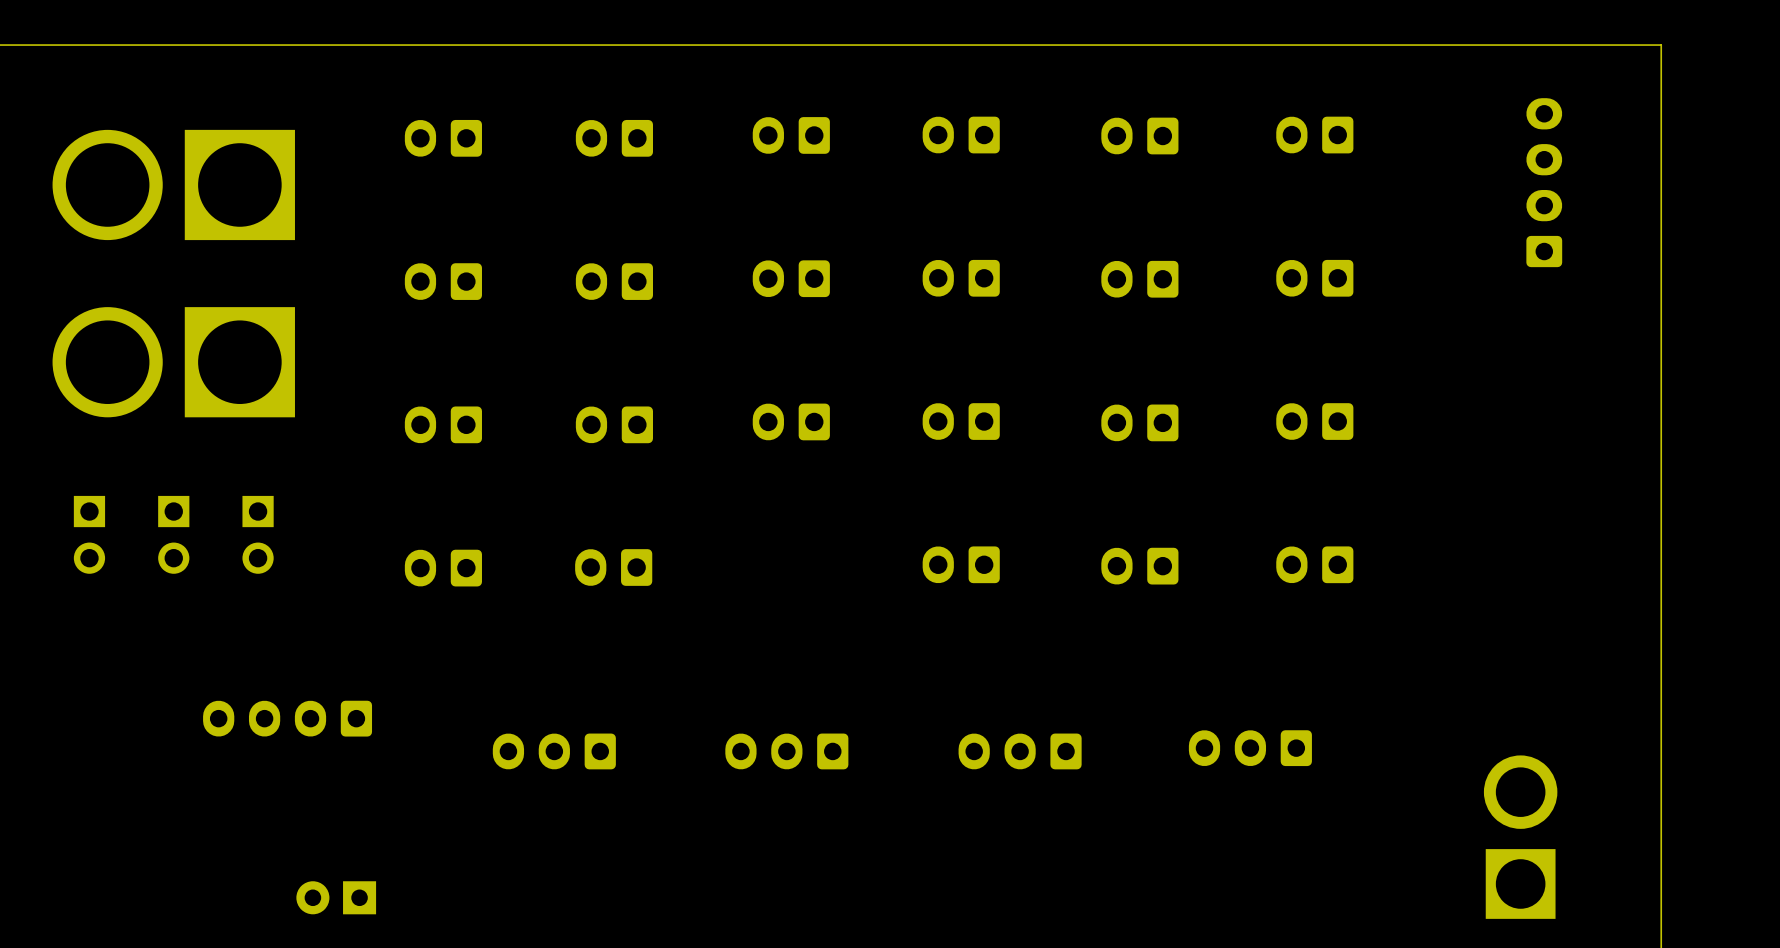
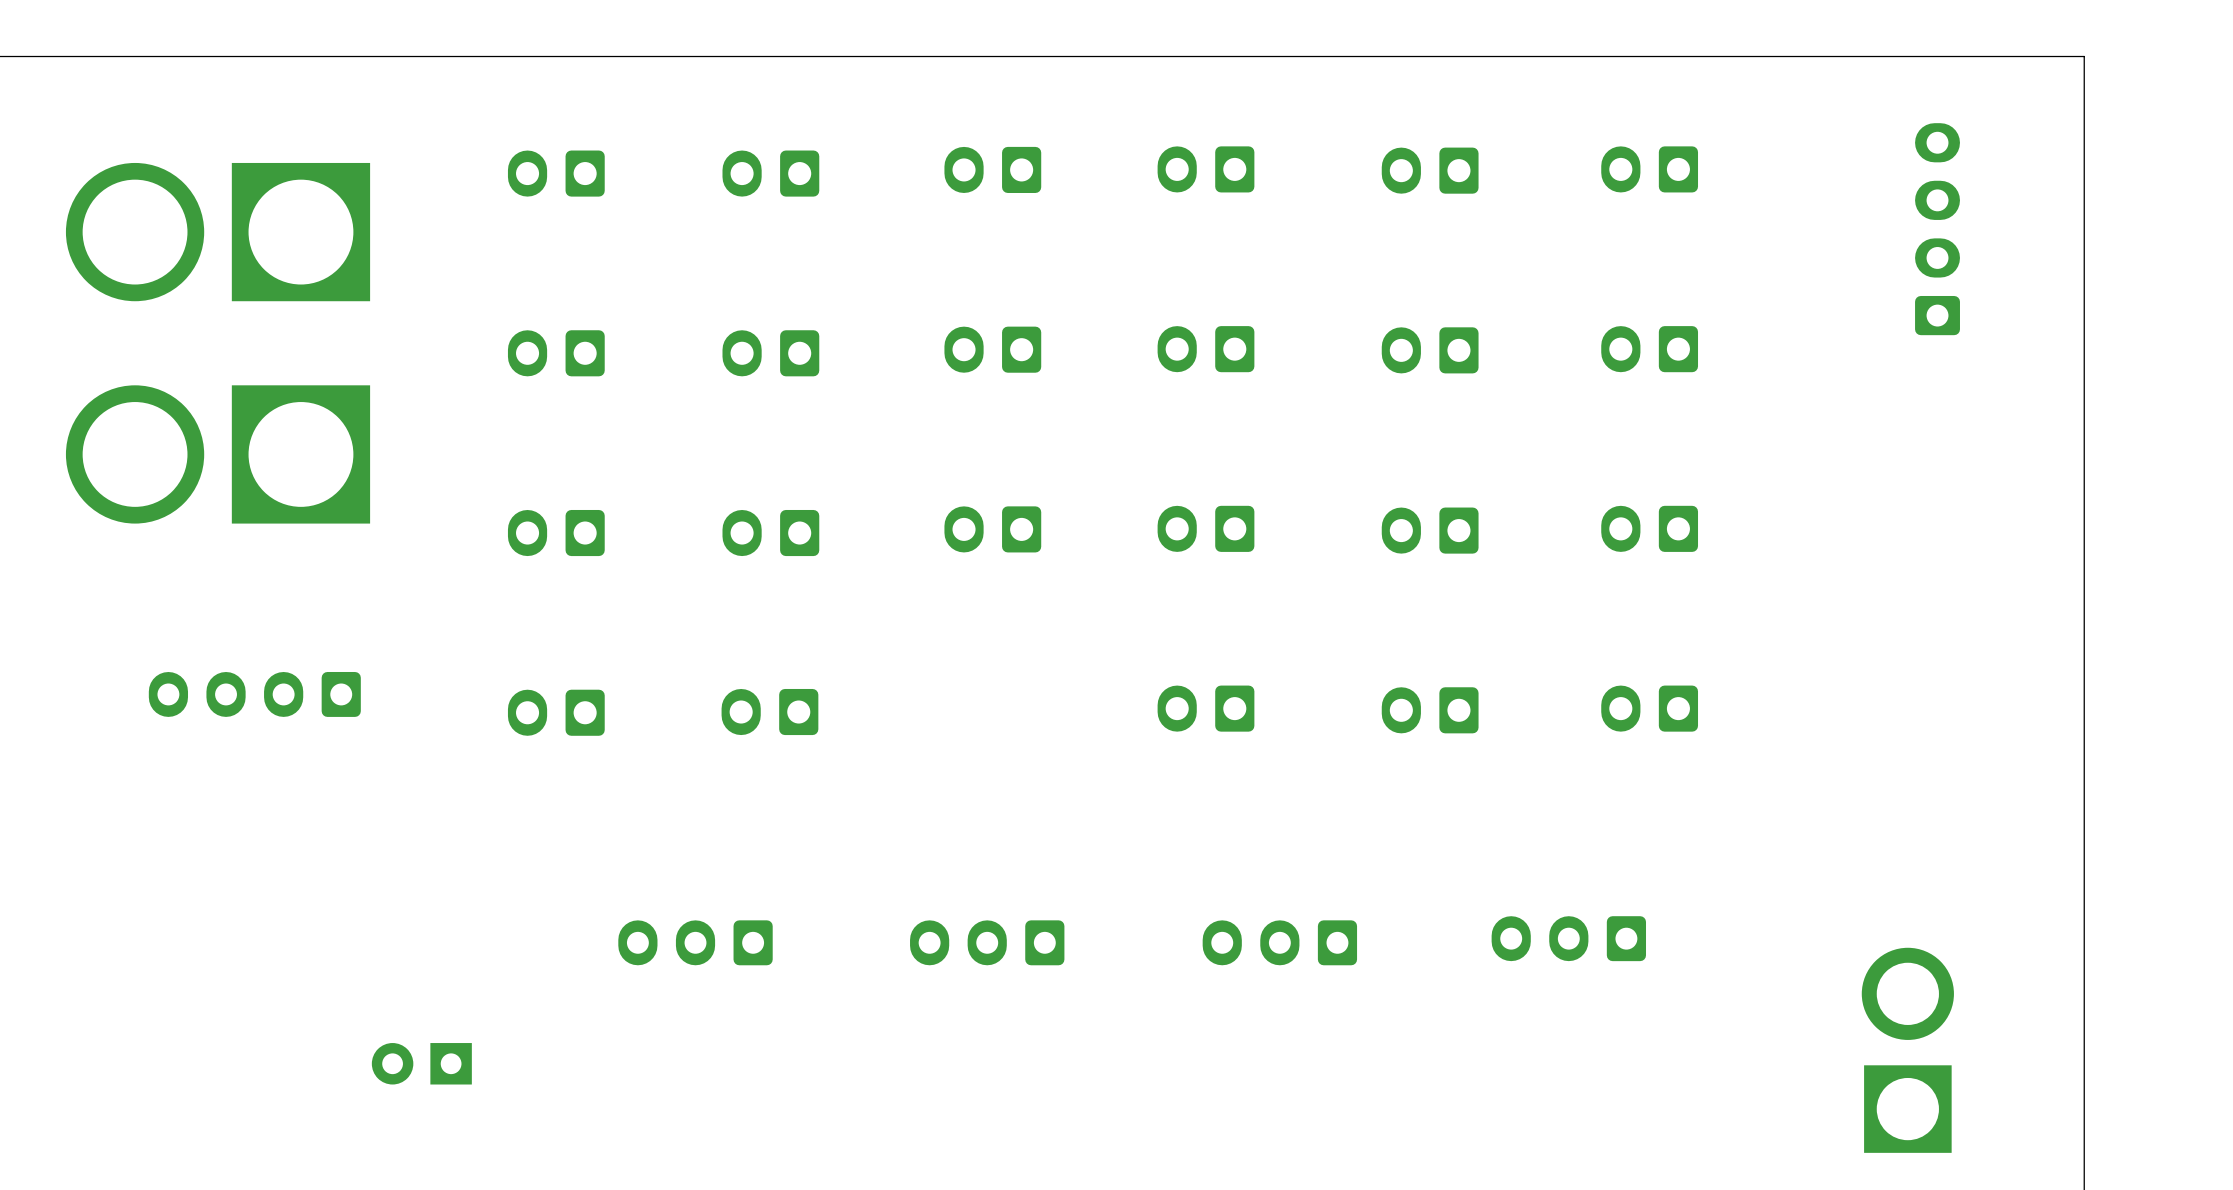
part: (89, 534) -> none
part: (173, 534) -> none
part: (258, 534) -> none
part position: (287, 718) -> (254, 694)
part position: (336, 897) -> (421, 1063)

